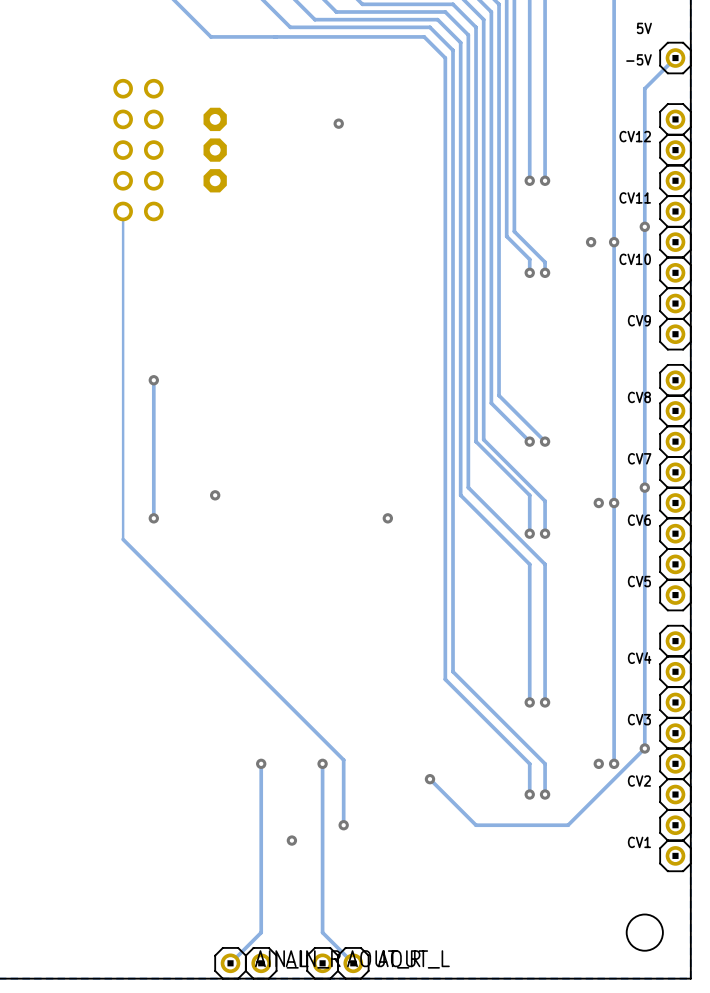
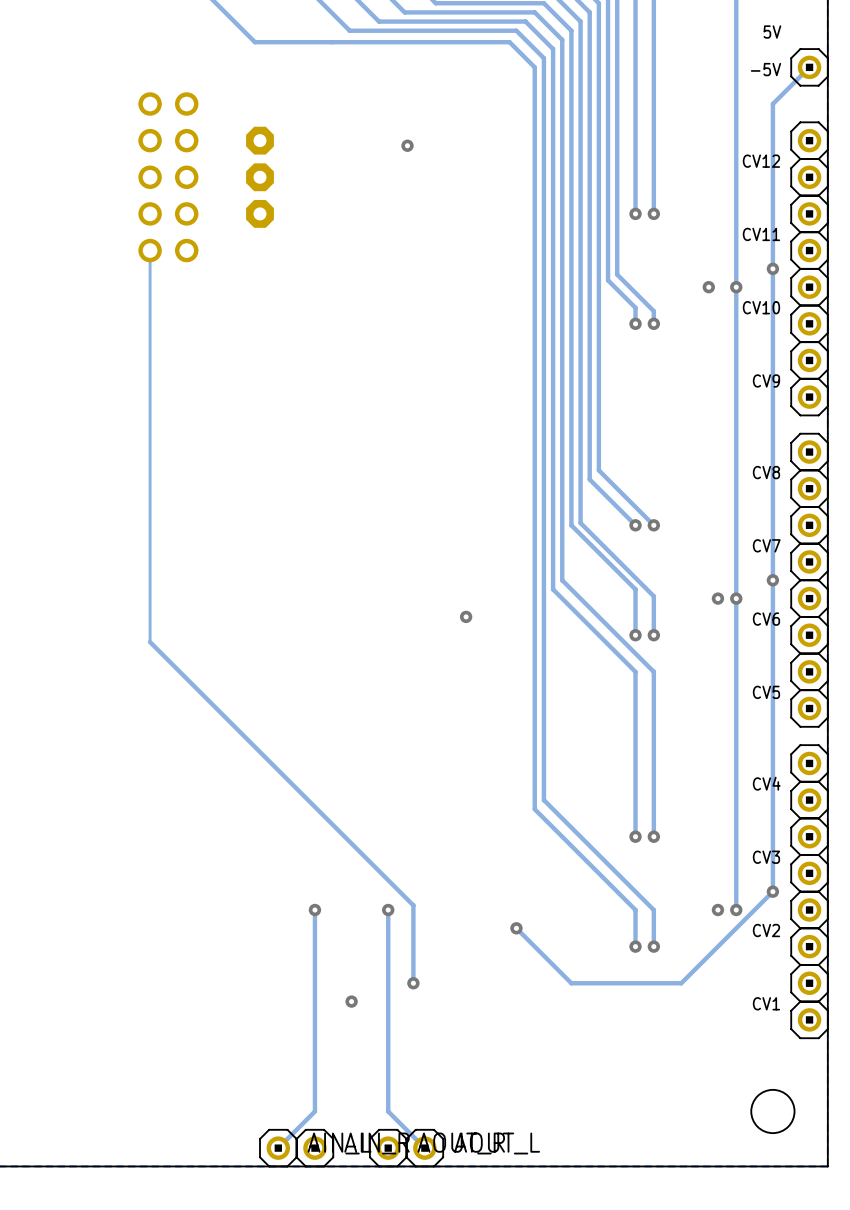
track: (153, 380) (153, 518) -> none
via: (153, 380) -> none
via: (215, 495) -> none
via: (153, 518) -> none

